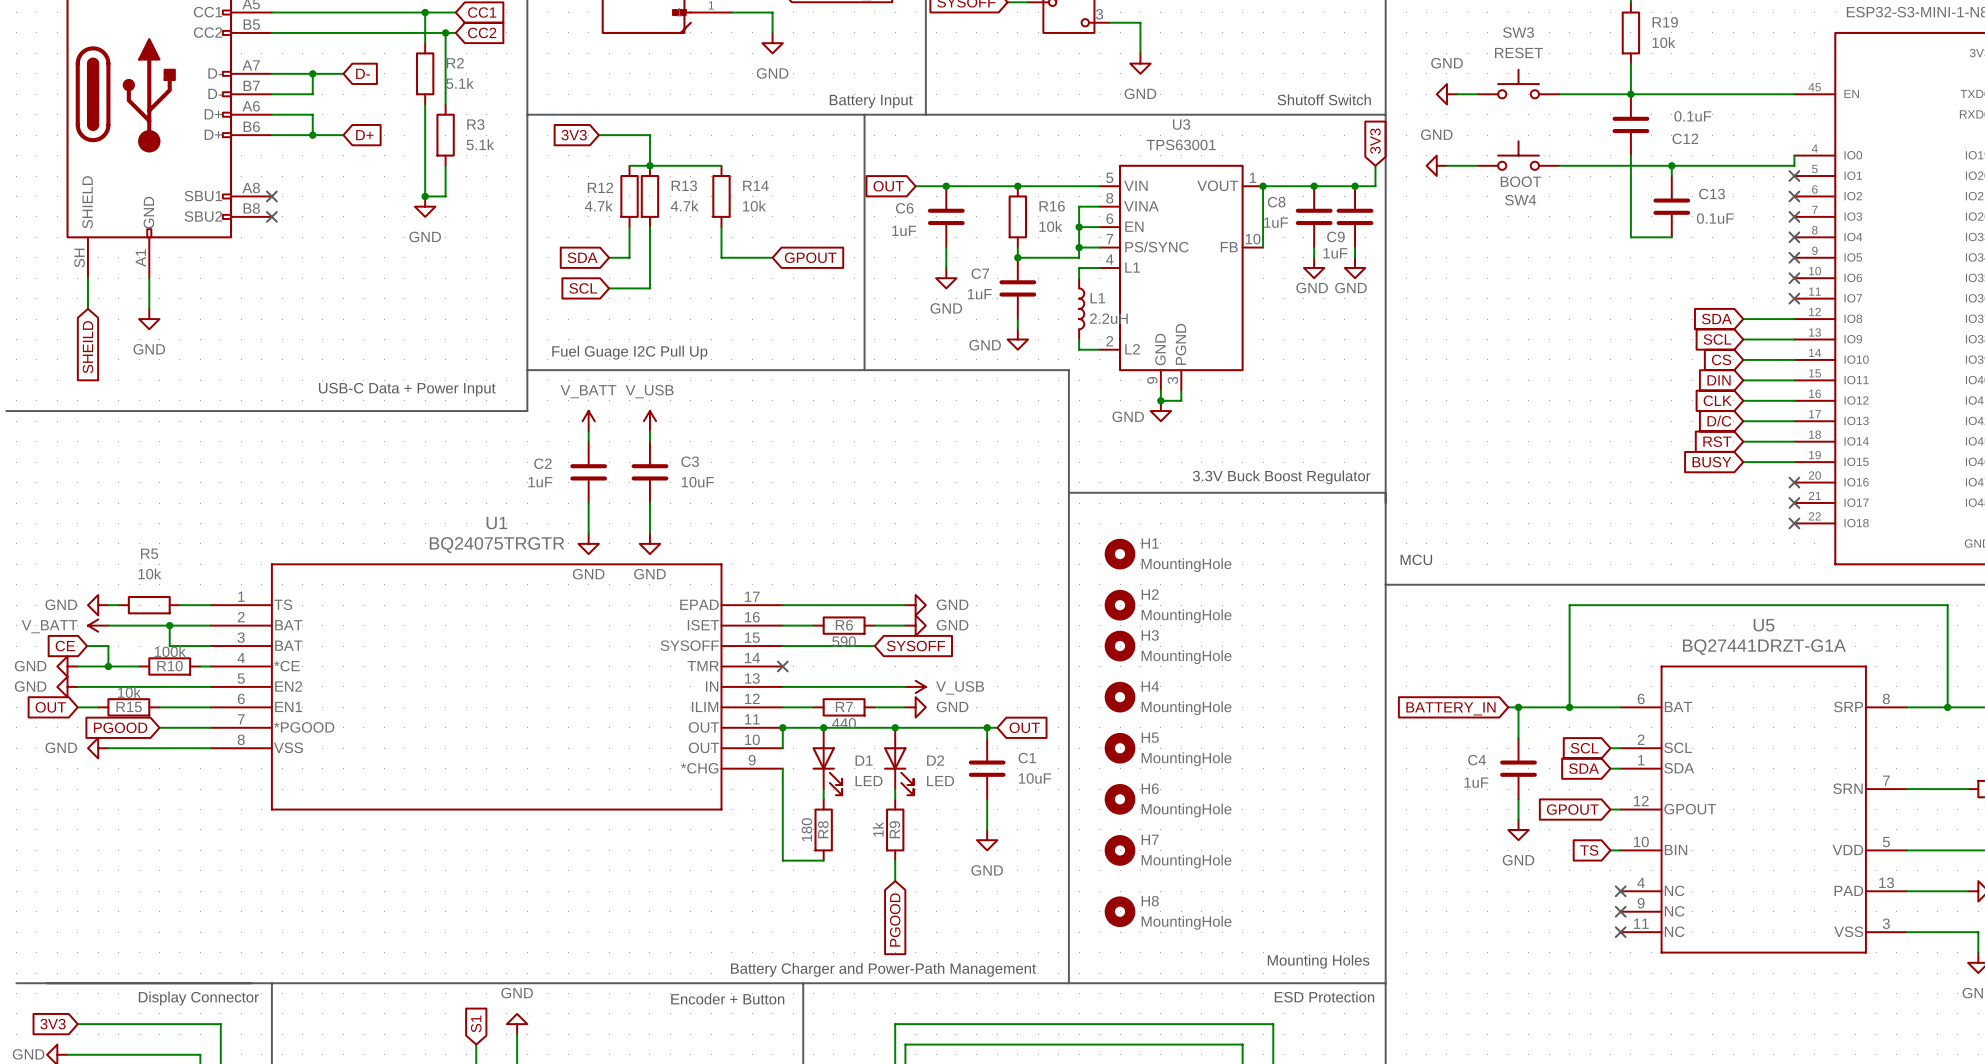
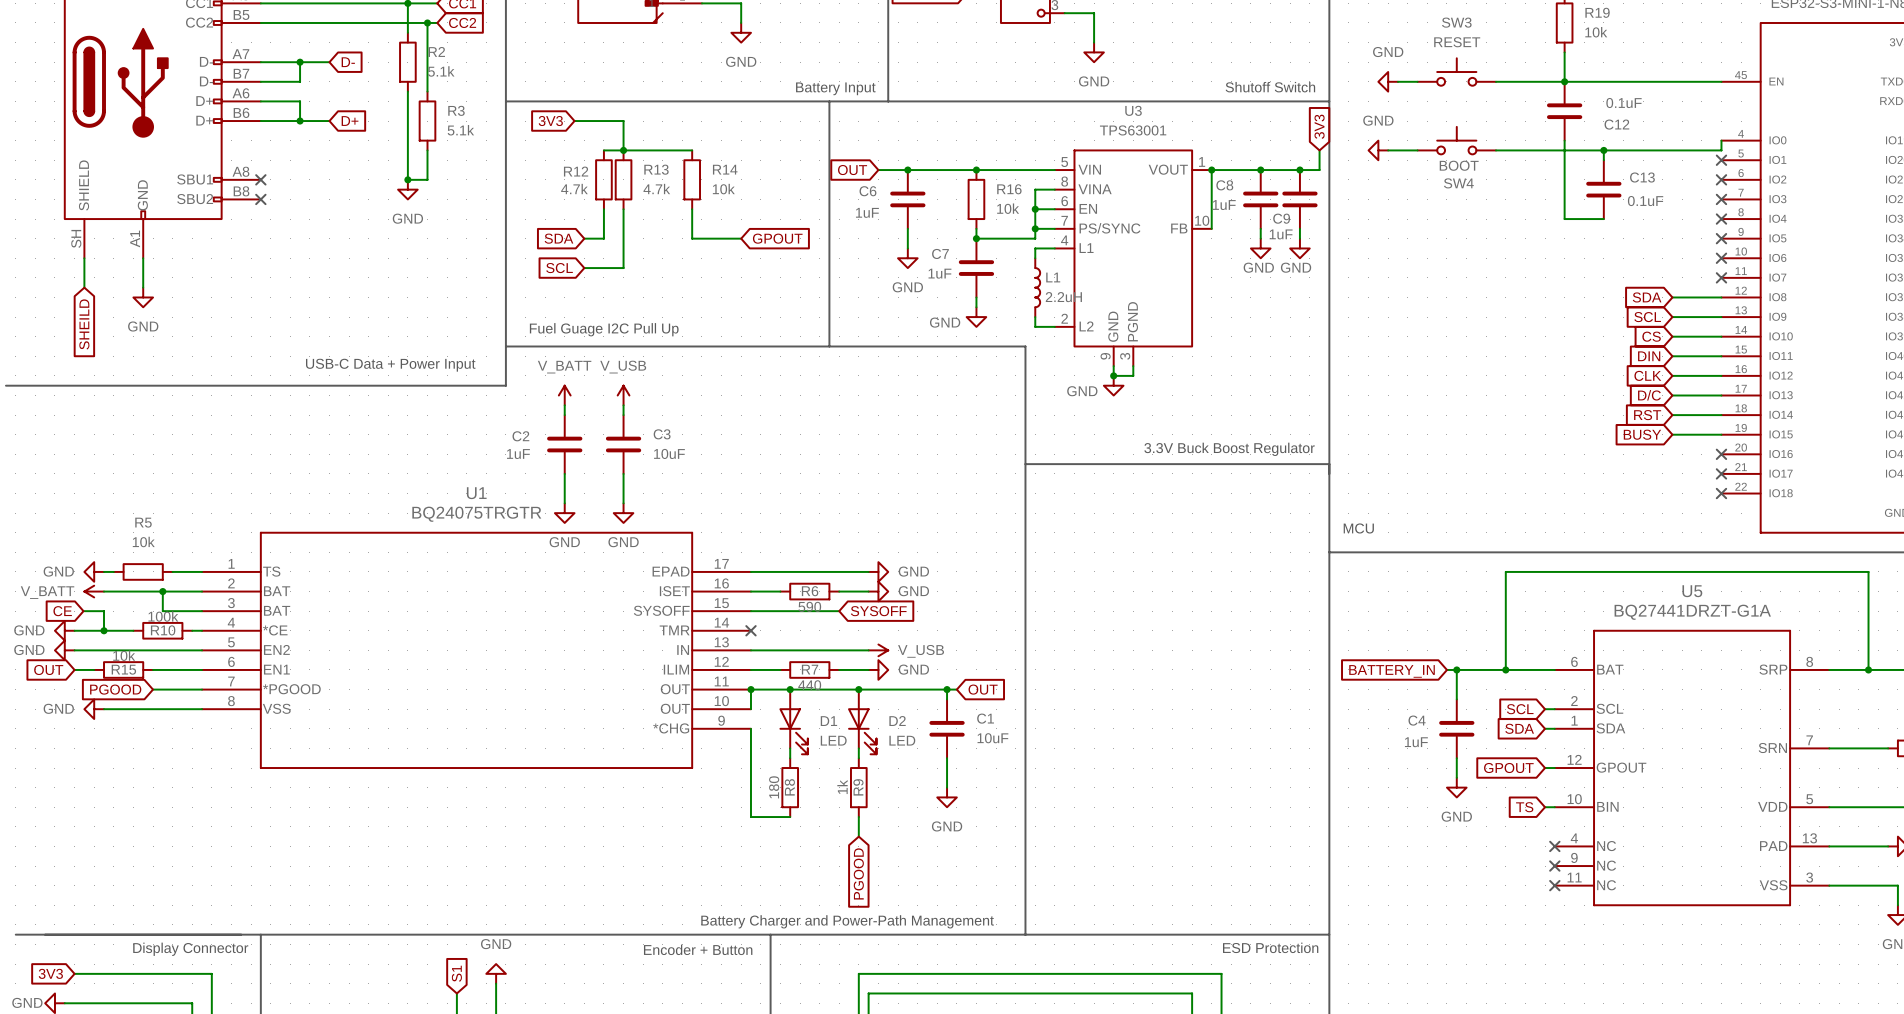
H1: MountingHole (1120, 554) -> none
H2: MountingHole (1120, 605) -> none
H3: MountingHole (1120, 646) -> none
H4: MountingHole (1120, 697) -> none
H5: MountingHole (1120, 748) -> none
H6: MountingHole (1120, 799) -> none
H7: MountingHole (1120, 850) -> none
H8: MountingHole (1120, 911) -> none
text: Mounting Holes (1318, 961) -> none

